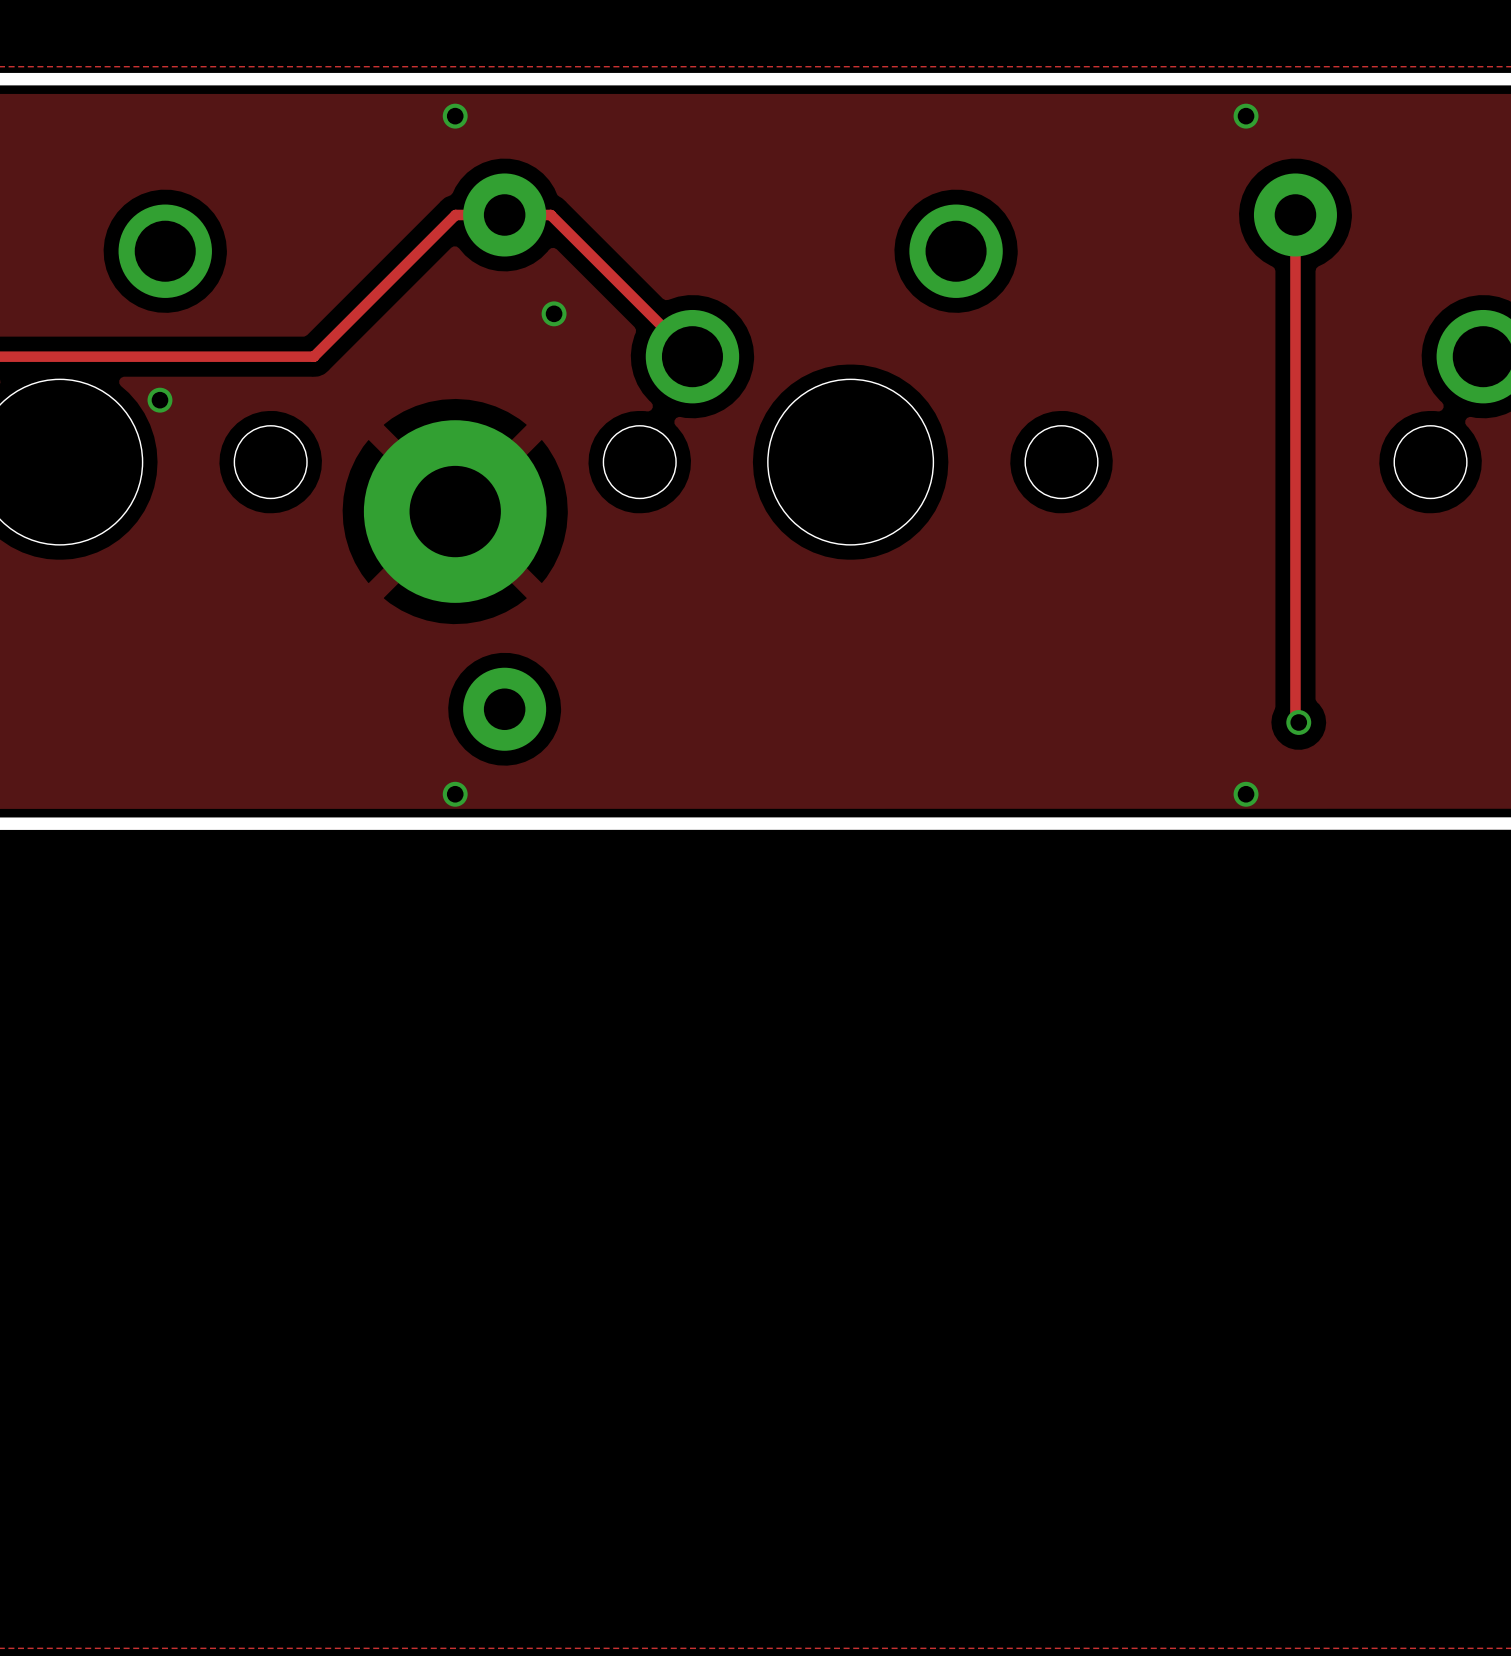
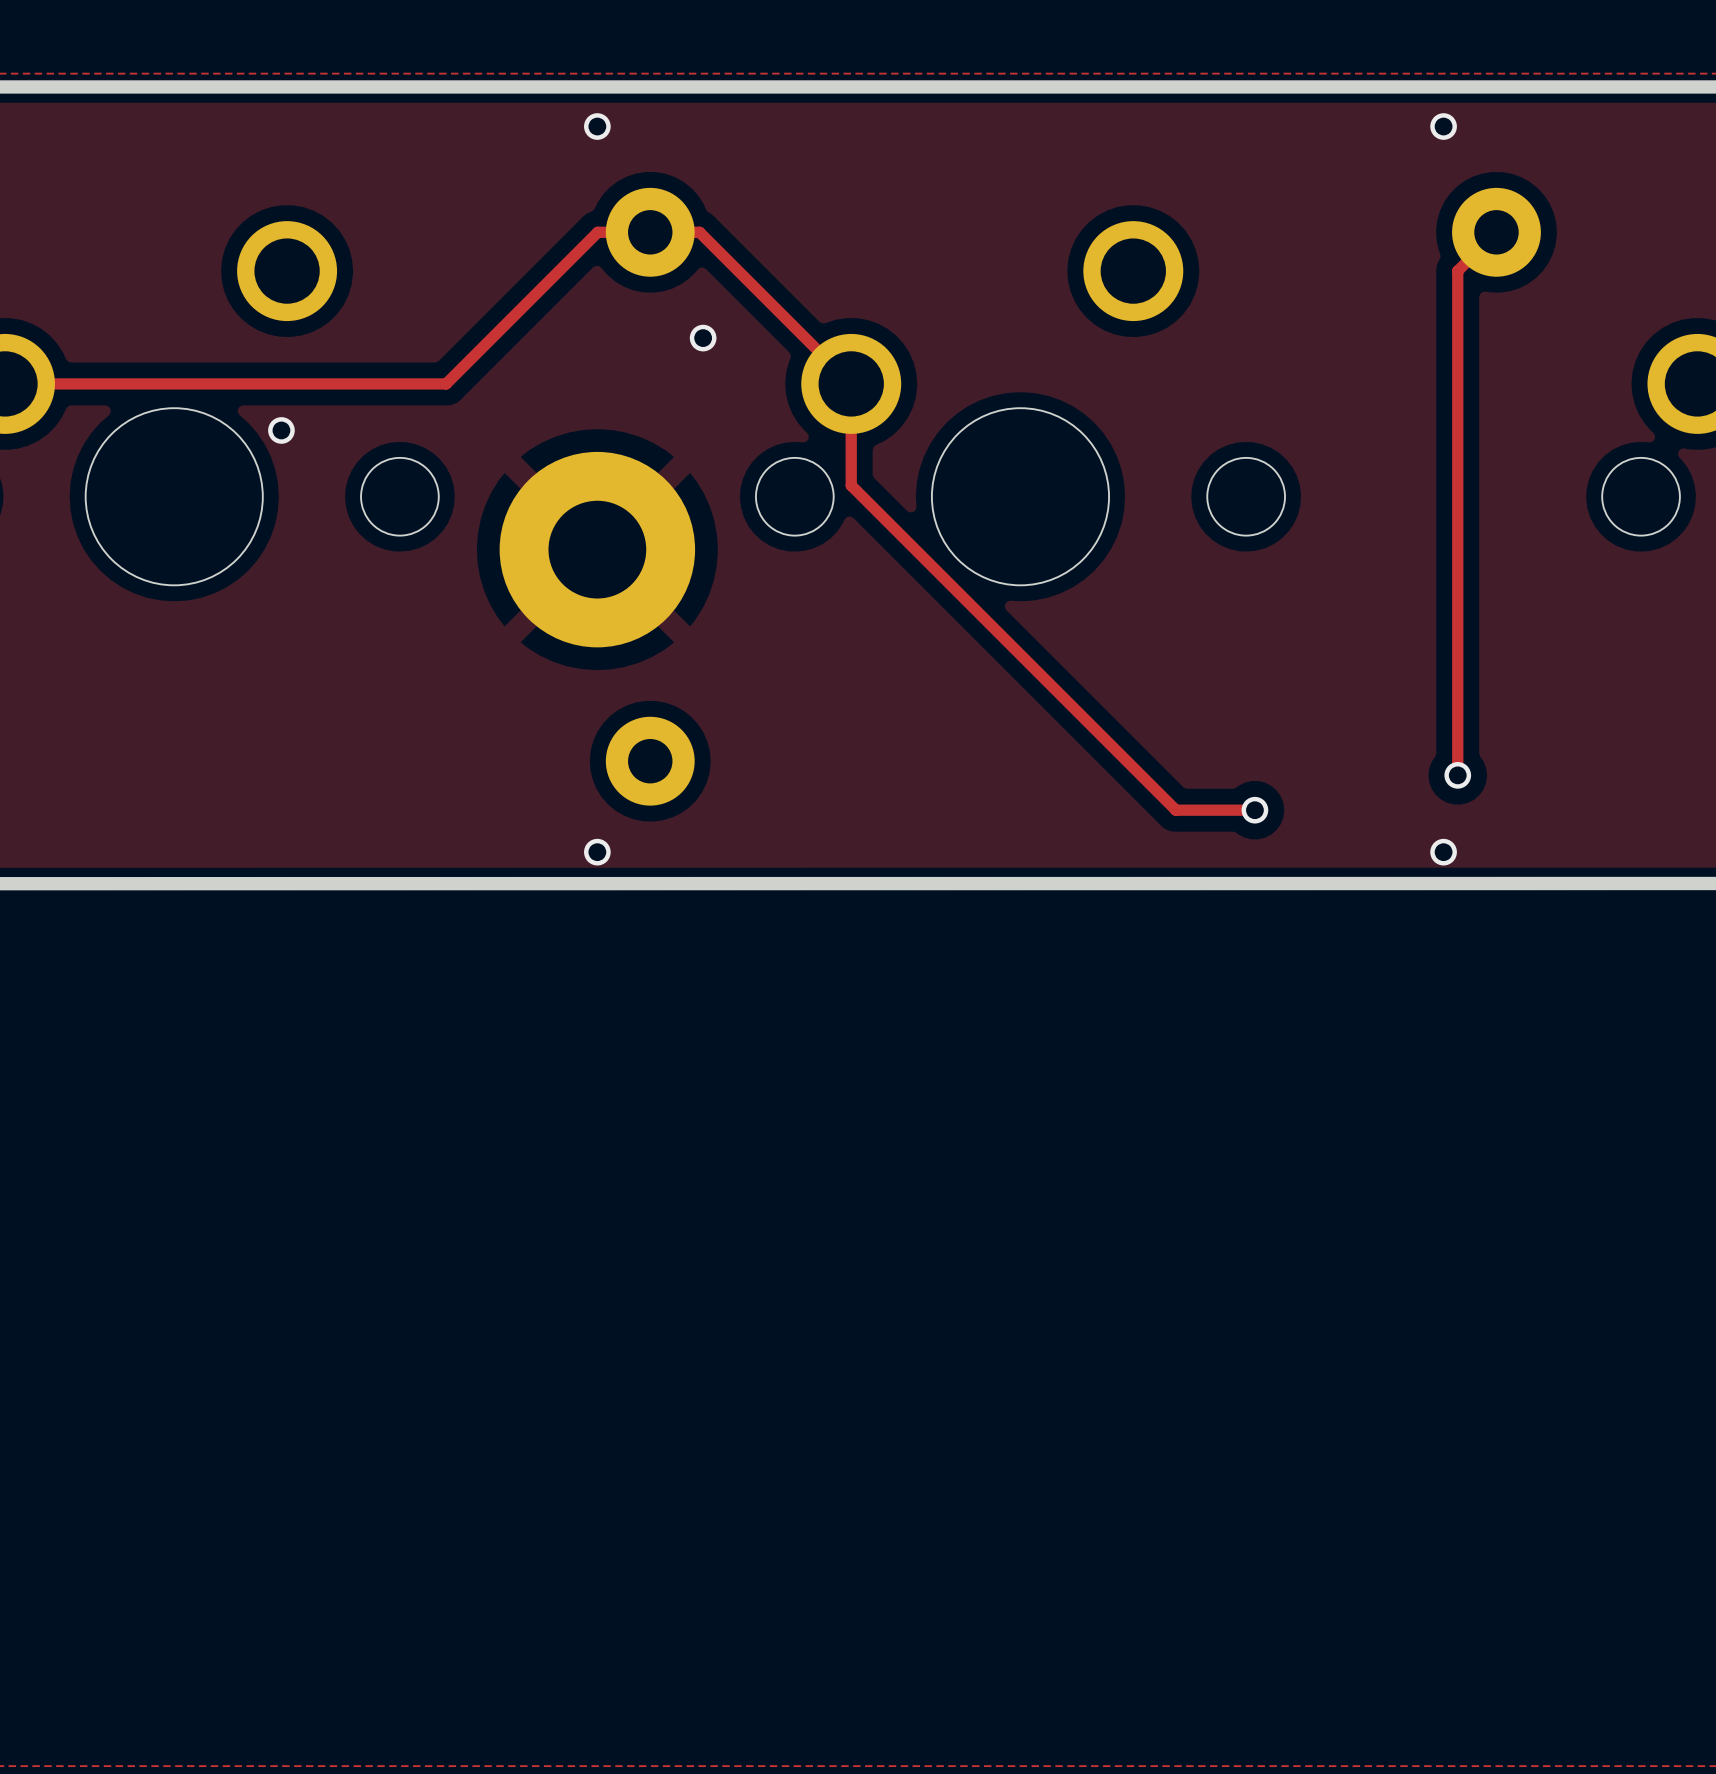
track: (1295, 214) (1295, 719) (1298, 722) -> (1496, 232) (1457, 271) (1457, 775)
track: none -> (851, 383) (851, 485) (1175, 810) (1254, 810)
via position: (1298, 722) -> (1457, 775)
via: none -> (1254, 810)

